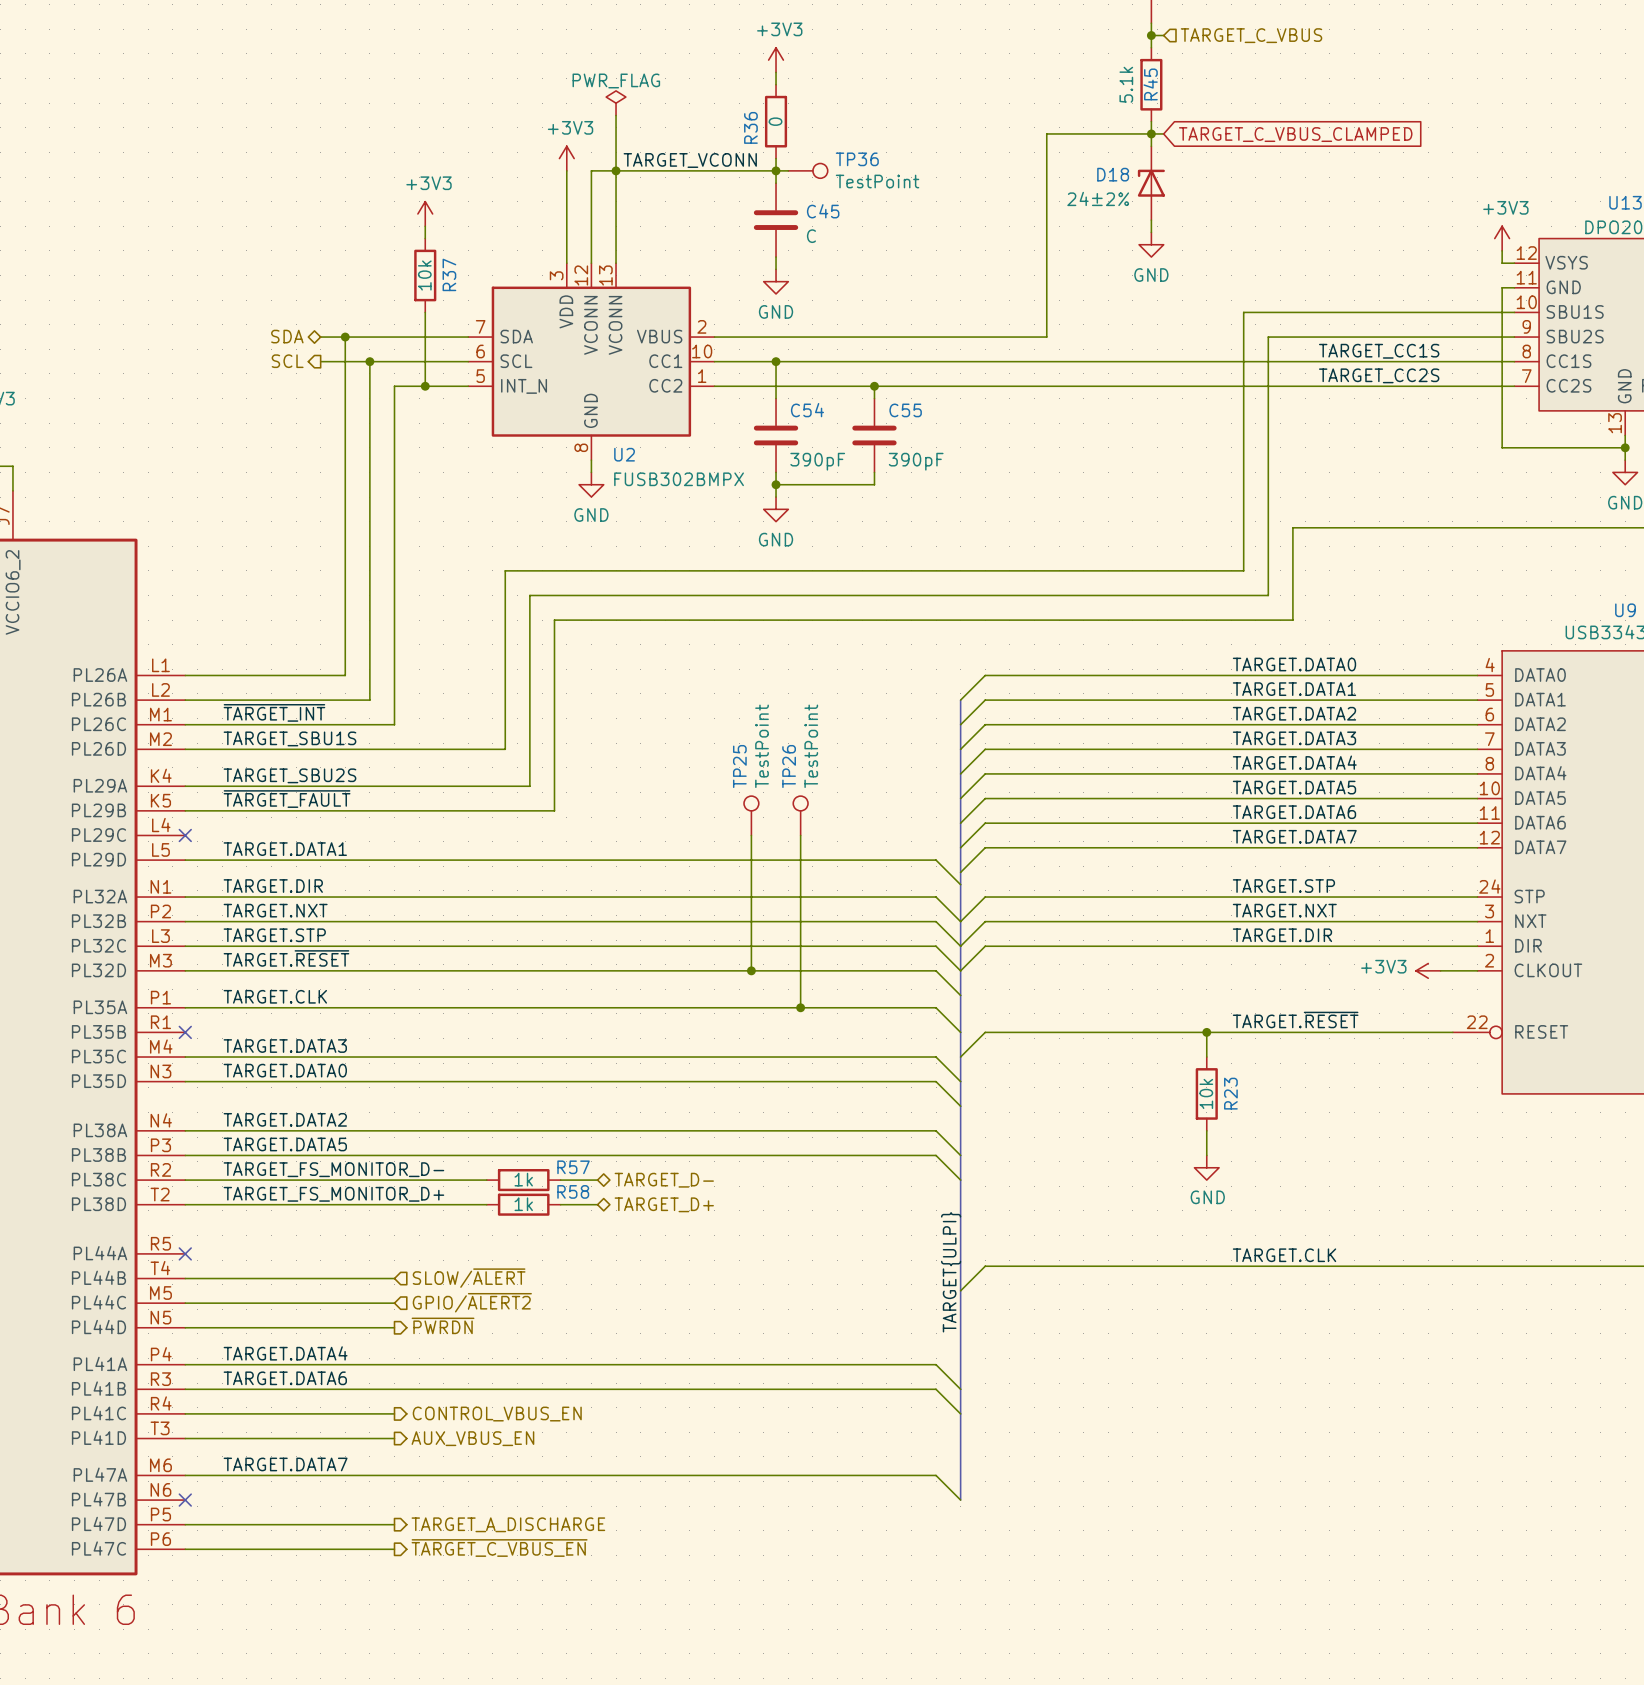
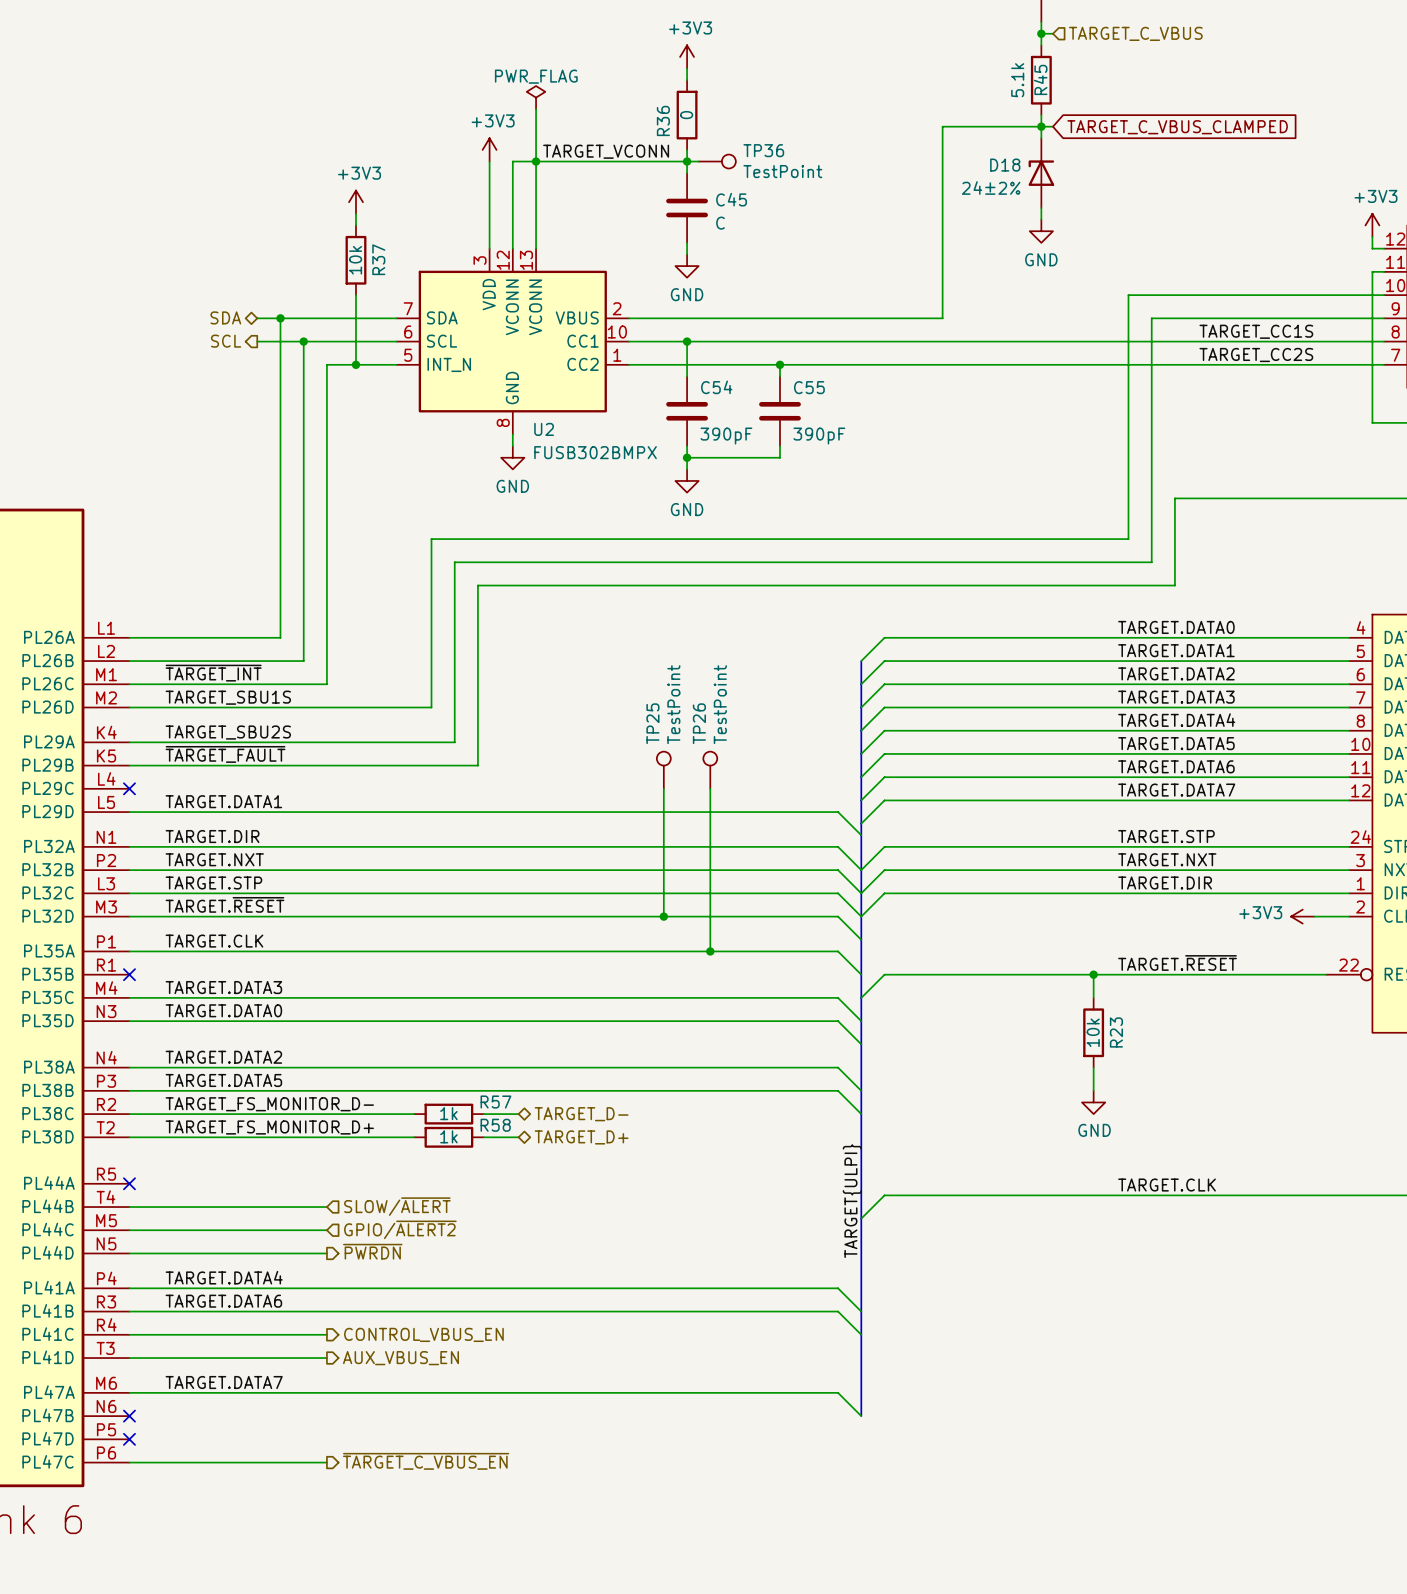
wire: (185, 1524) (394, 1524) -> none
no-connect mark: none -> (129, 1439)
hierarchical label: TARGET_A_DISCHARGE (508, 1524) -> none

